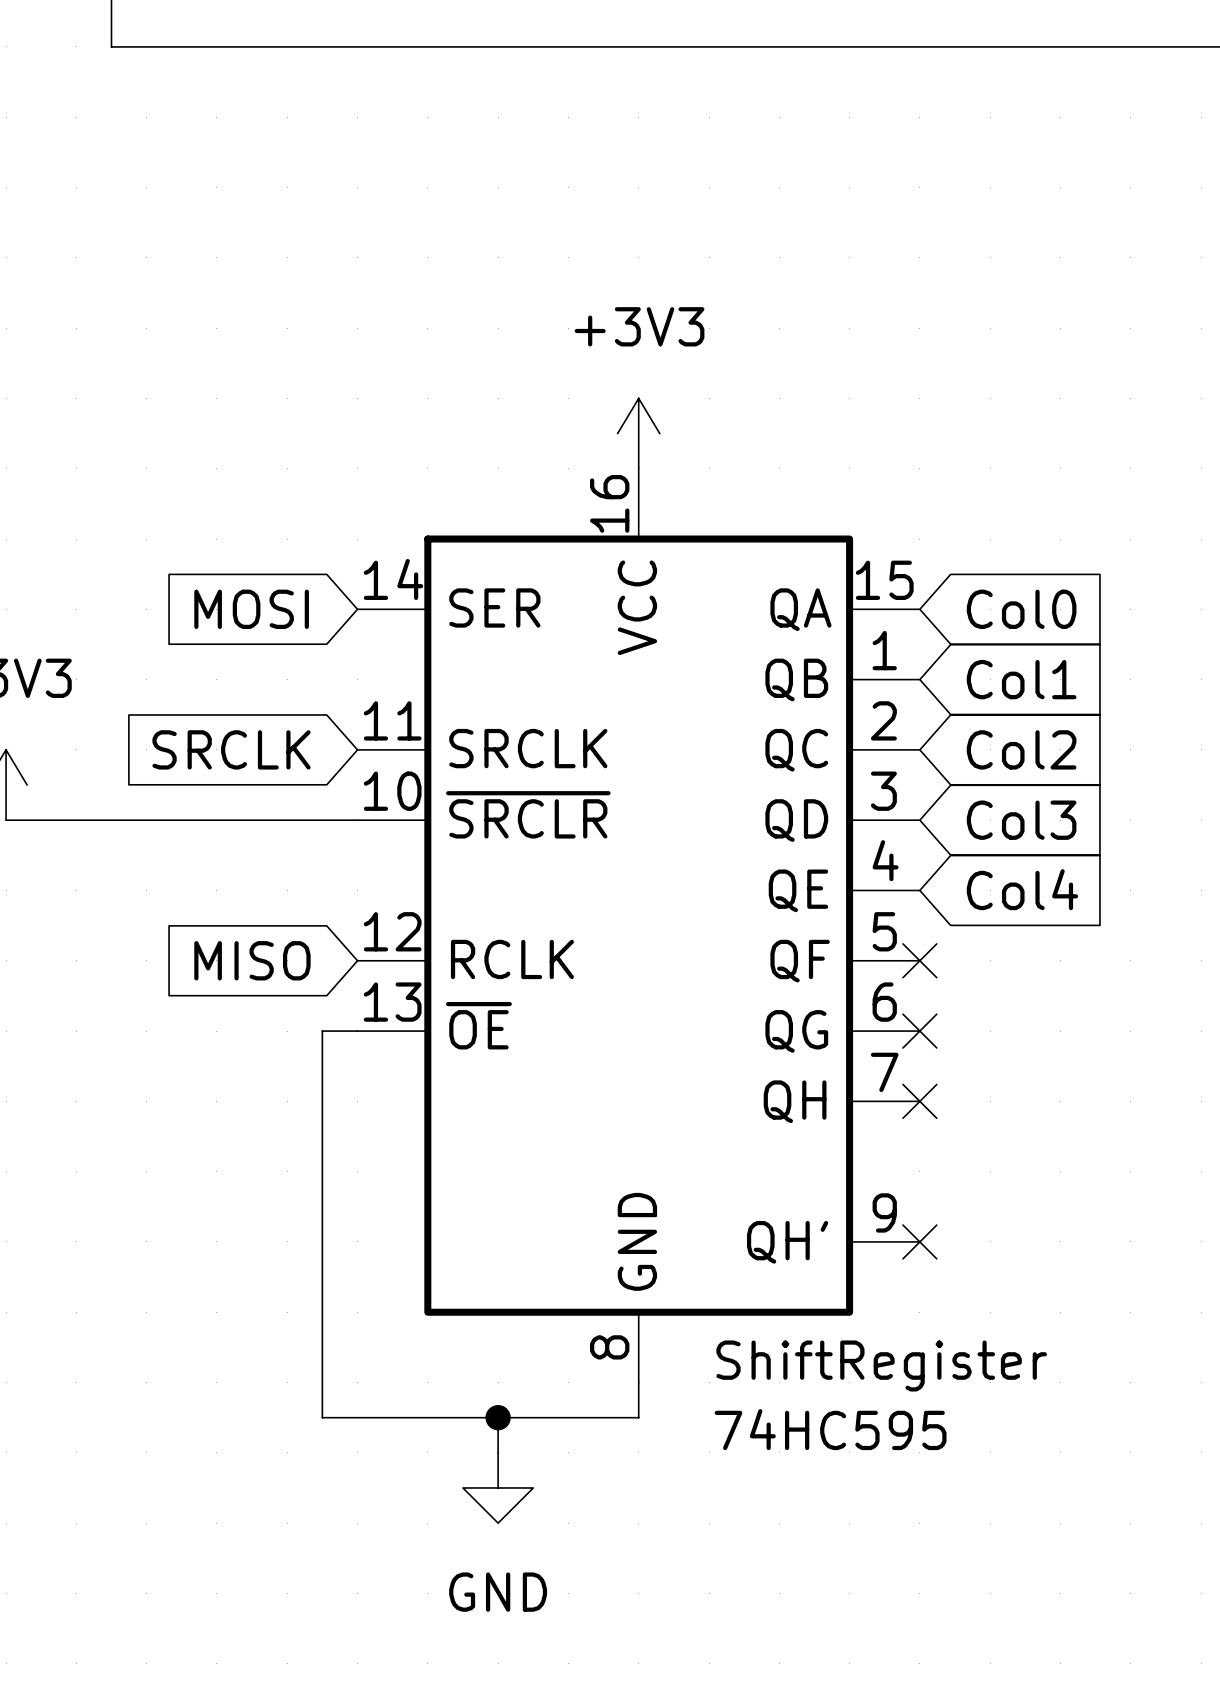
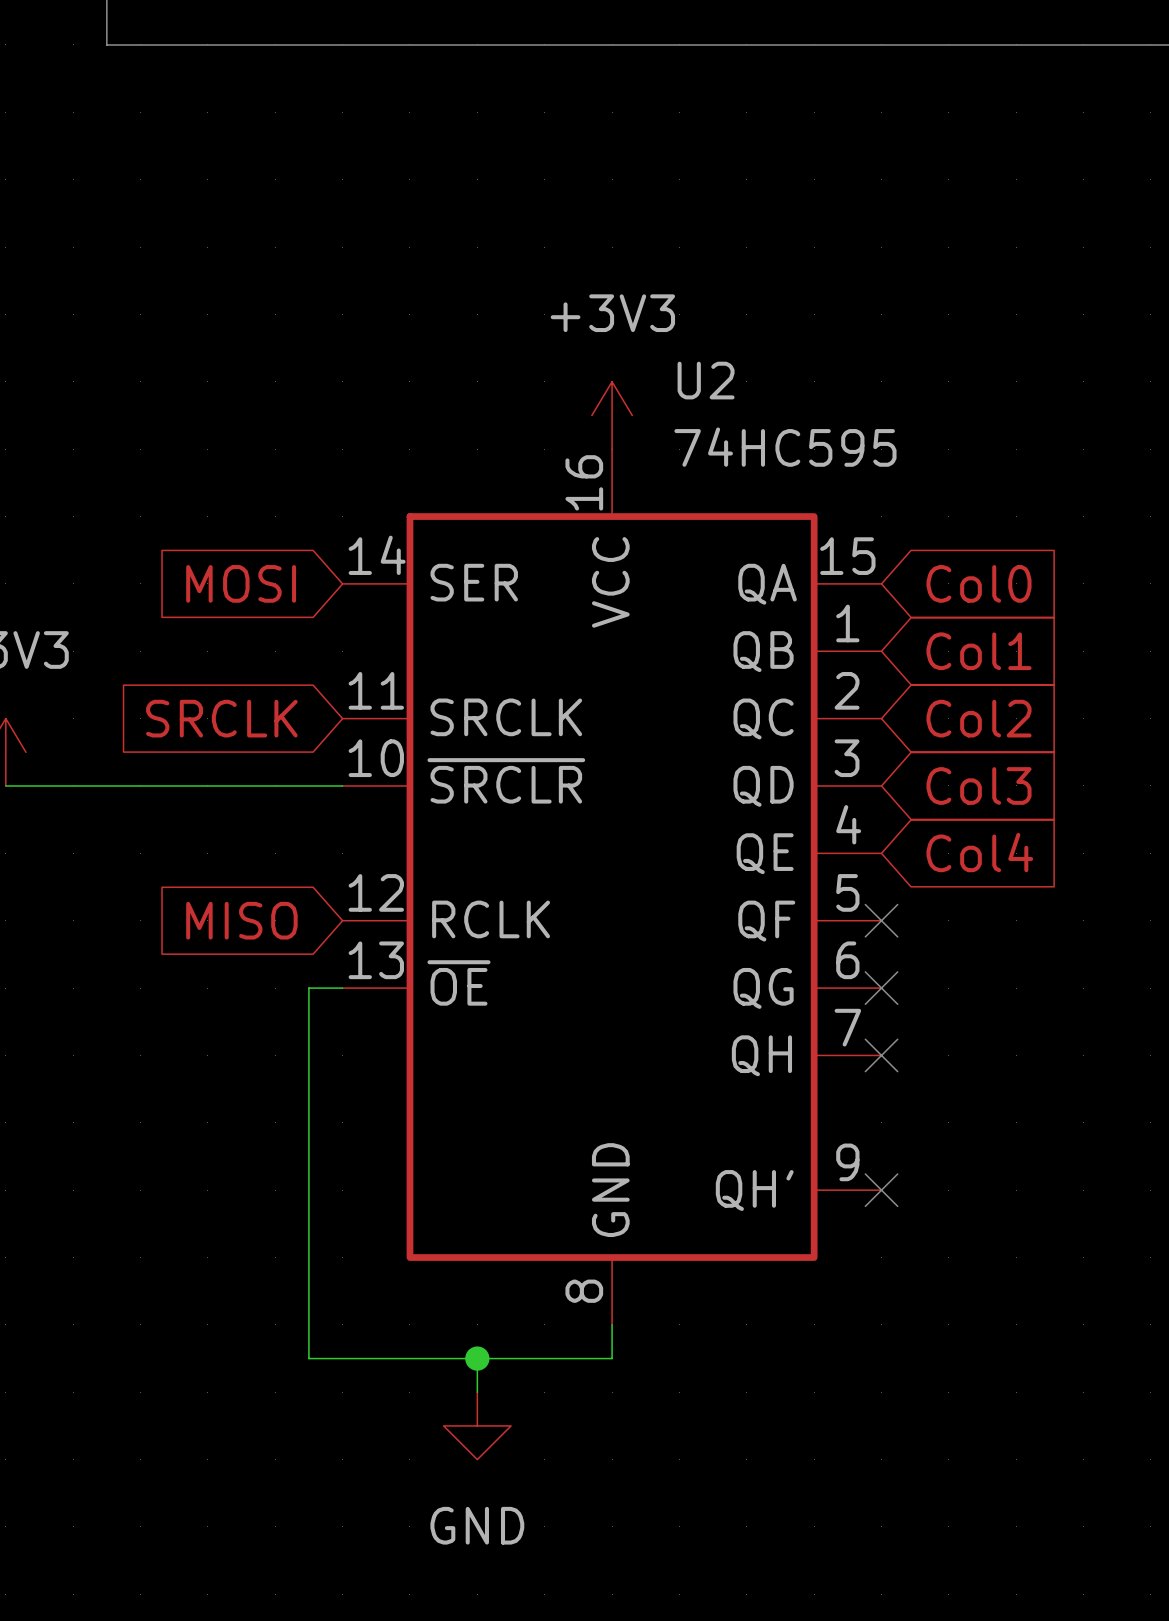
ShiftRegister name: ShiftRegister (881, 1366) -> U2 (706, 380)
ShiftRegister value position: 74HC595 (830, 1429) -> 74HC595 (785, 447)

